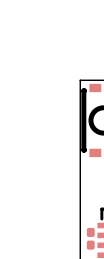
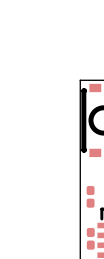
part: none -> (90, 196)

